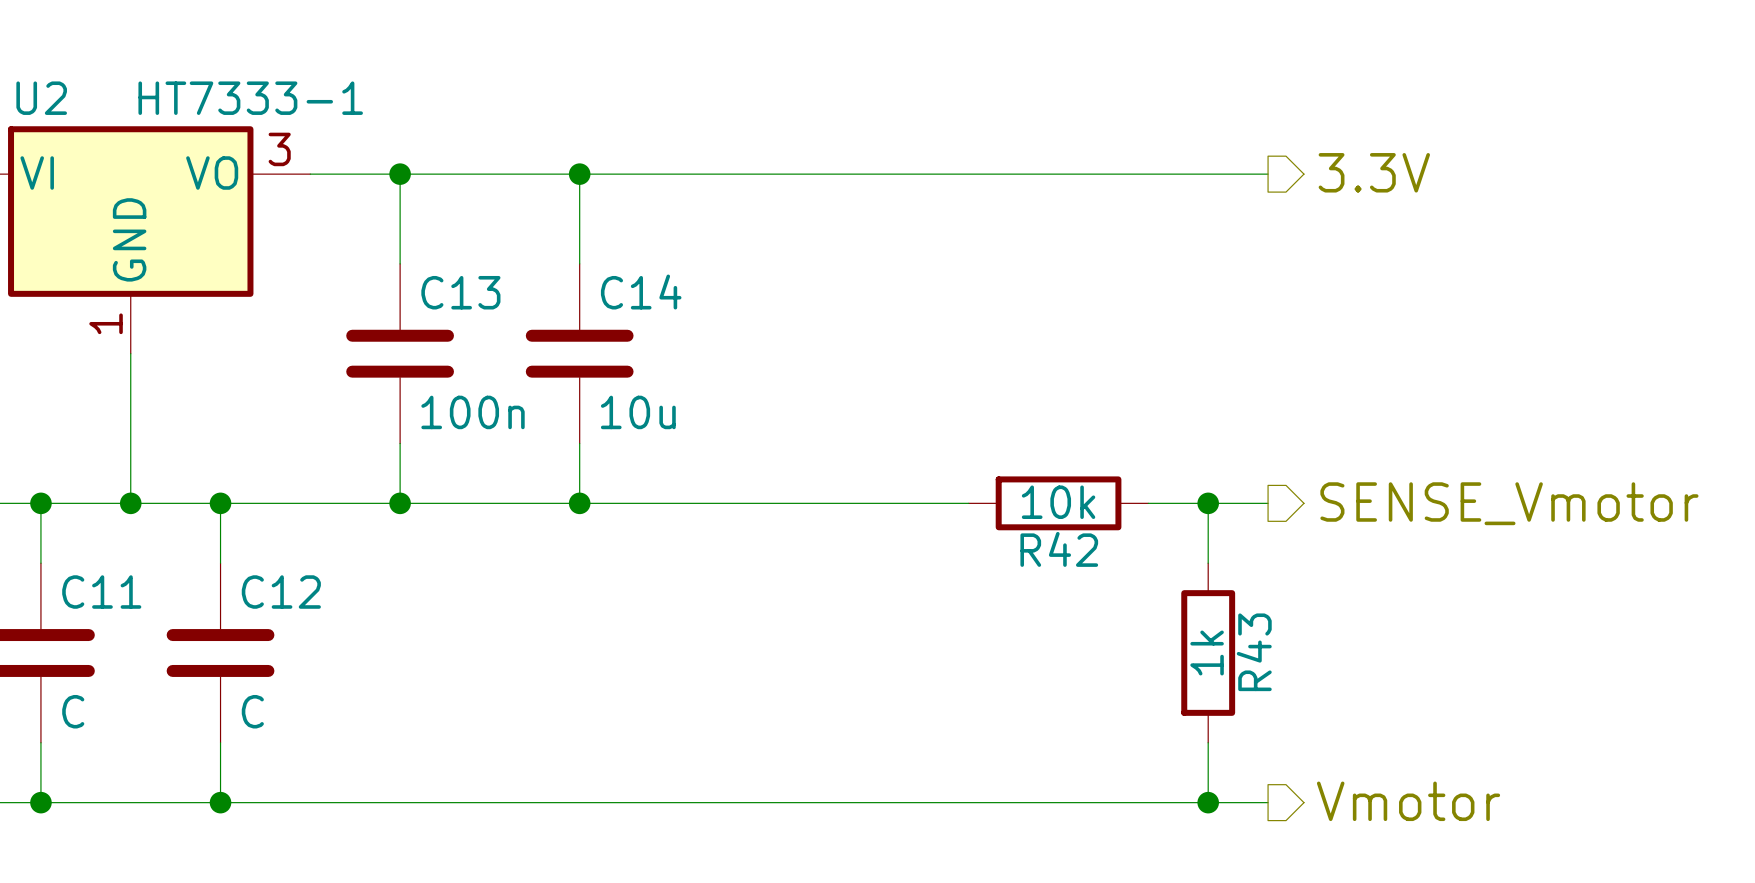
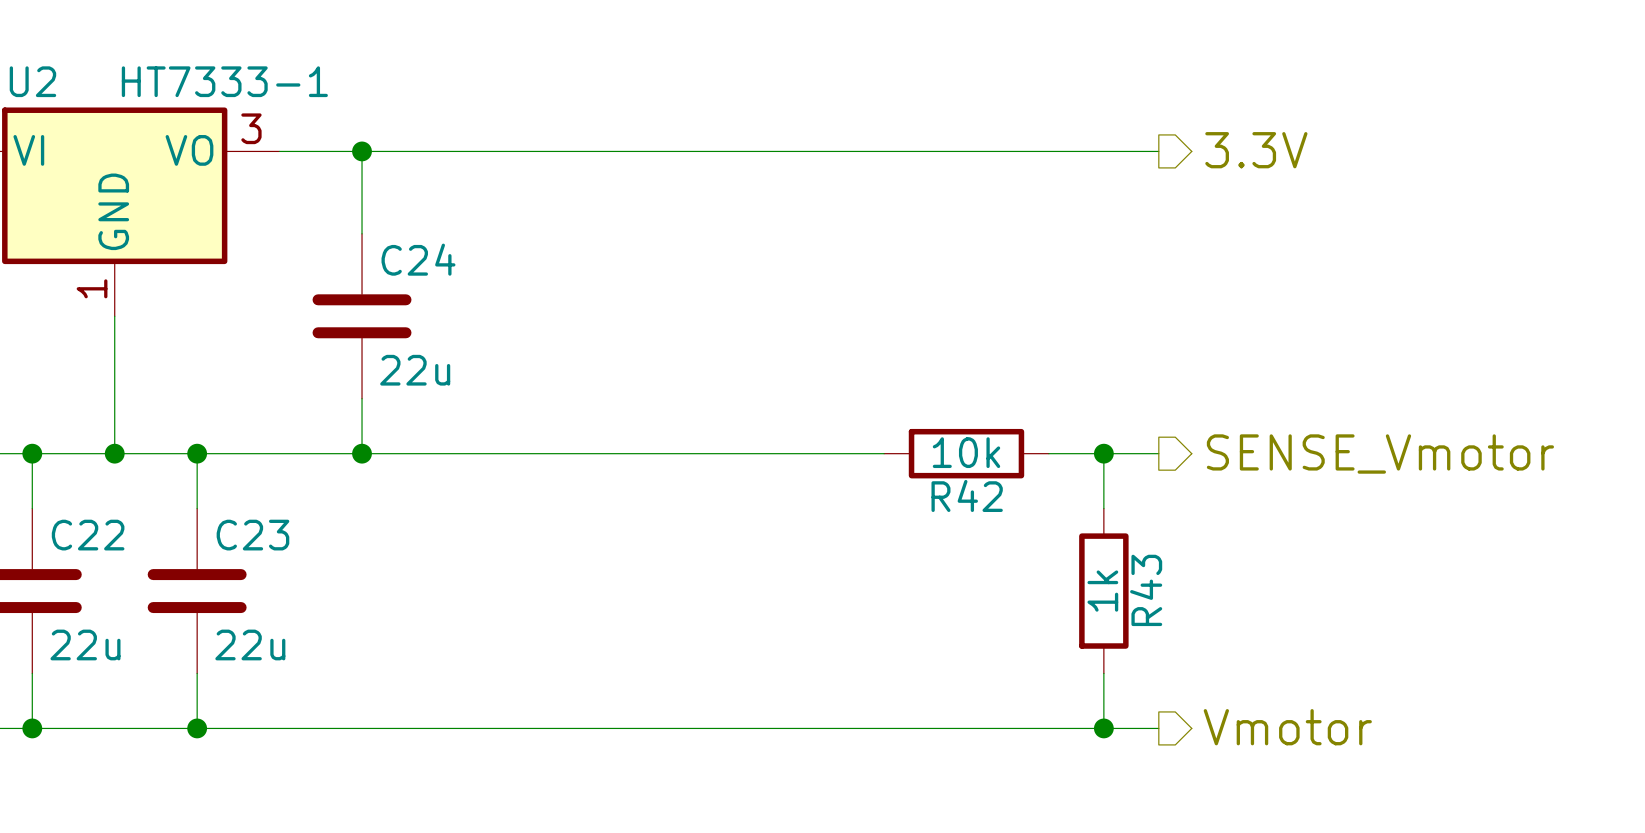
wire: (579, 174) (579, 263) -> none
junction: (579, 174) -> none
C13 name: C13 (460, 292) -> C24 (418, 259)
C14: 10u (579, 353) -> none
C13 value: 100n (473, 412) -> 22u (415, 370)
wire: (579, 443) (579, 503) -> none
junction: (579, 503) -> none
C11 name: C11 (101, 592) -> C22 (88, 535)
C12 name: C12 (281, 592) -> C23 (252, 535)
C11 value: C (73, 711) -> 22u (85, 644)
C12 value: C (252, 711) -> 22u (250, 644)

